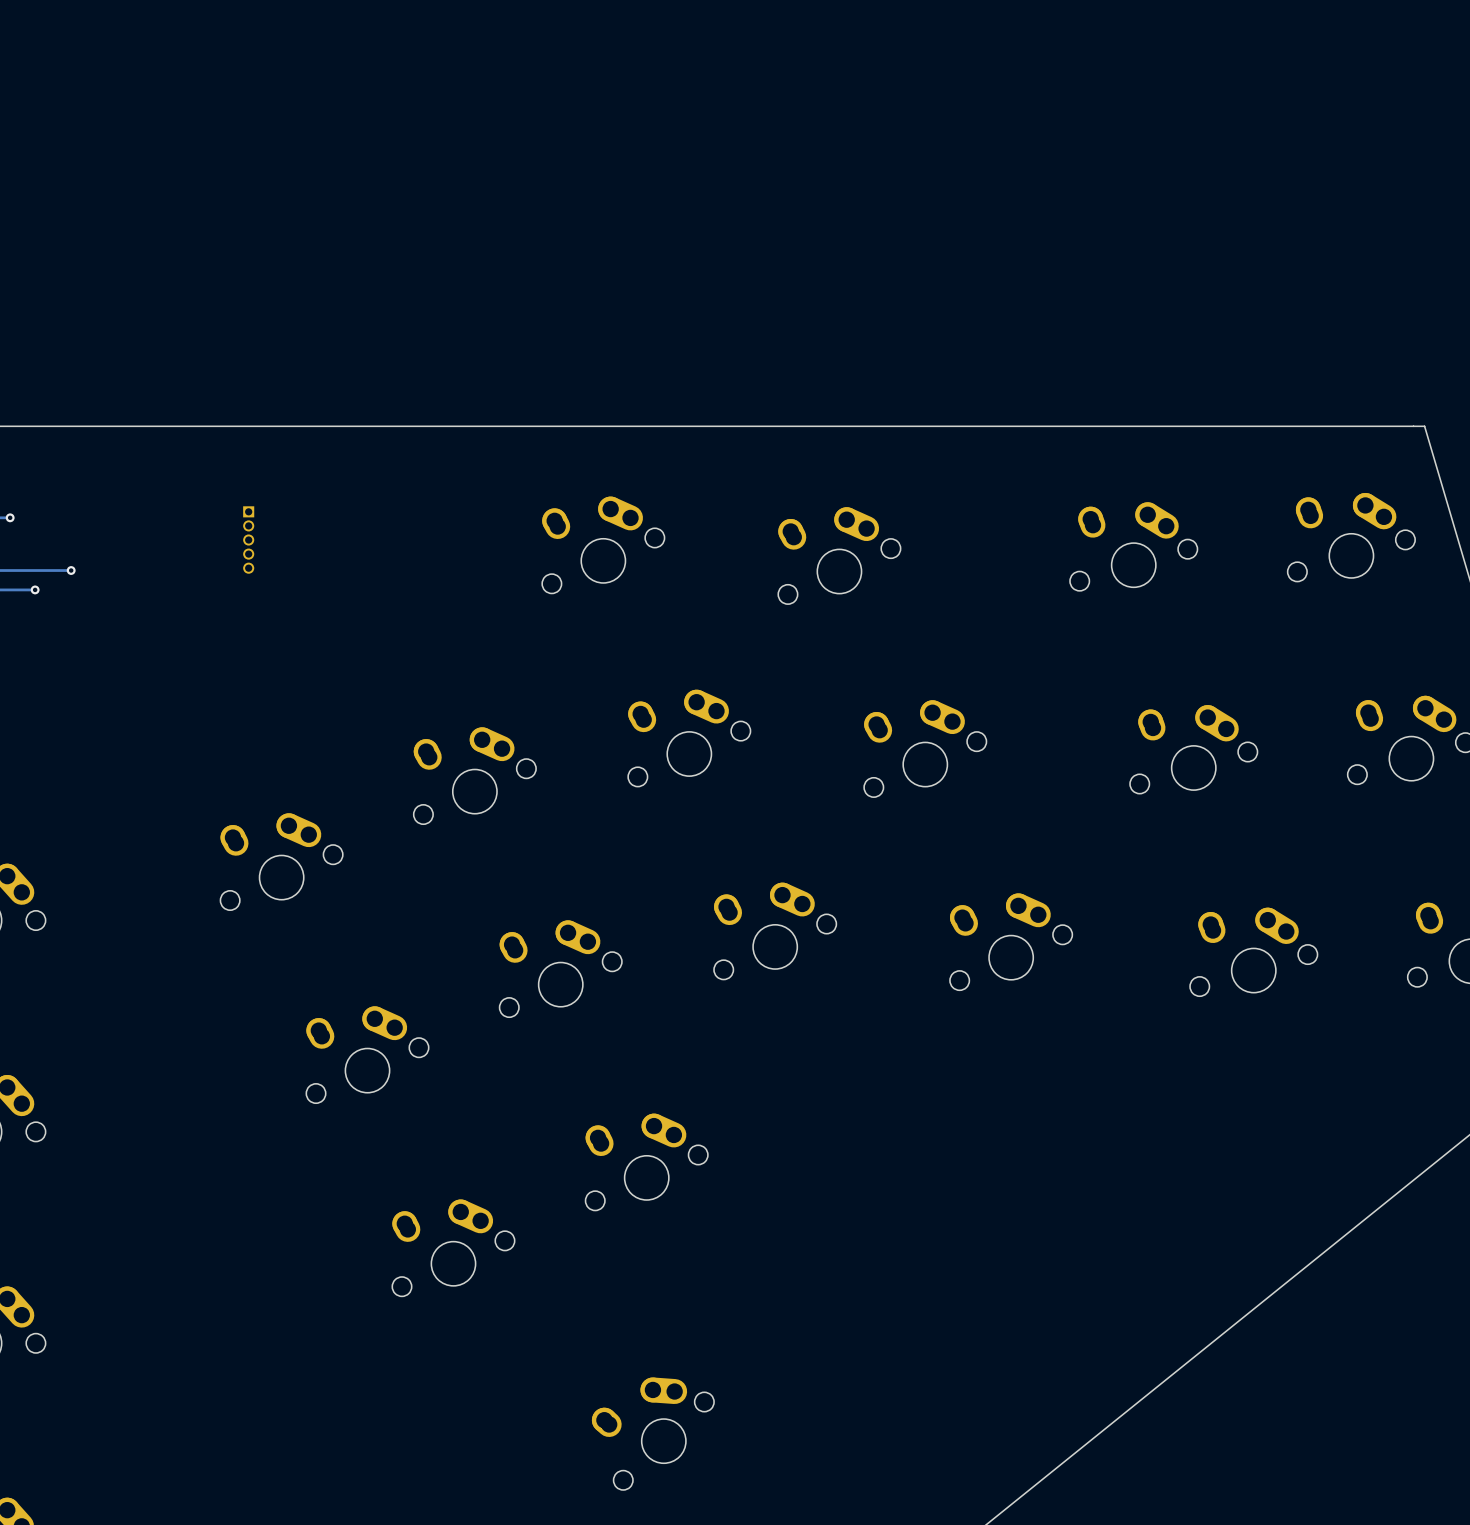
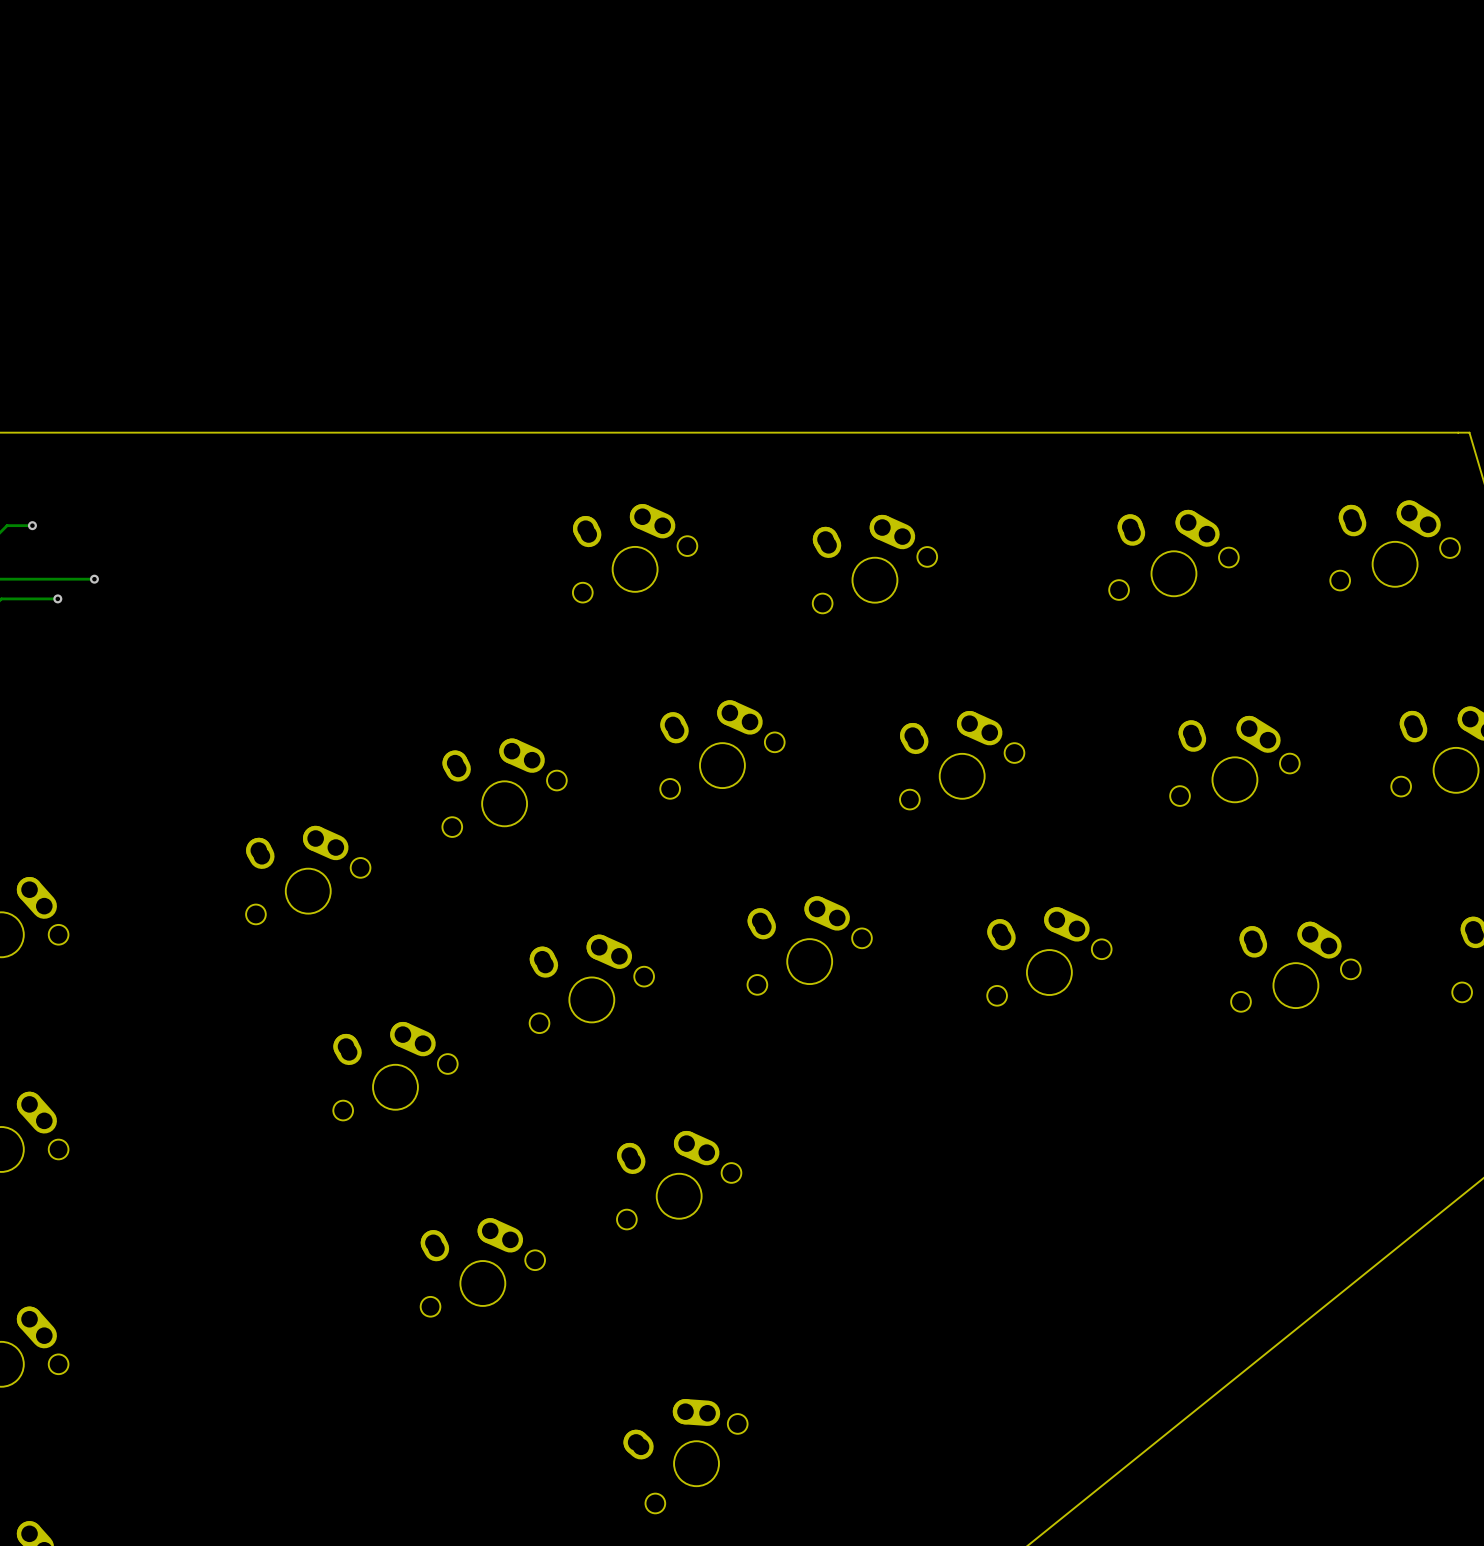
part: (248, 540) -> none

